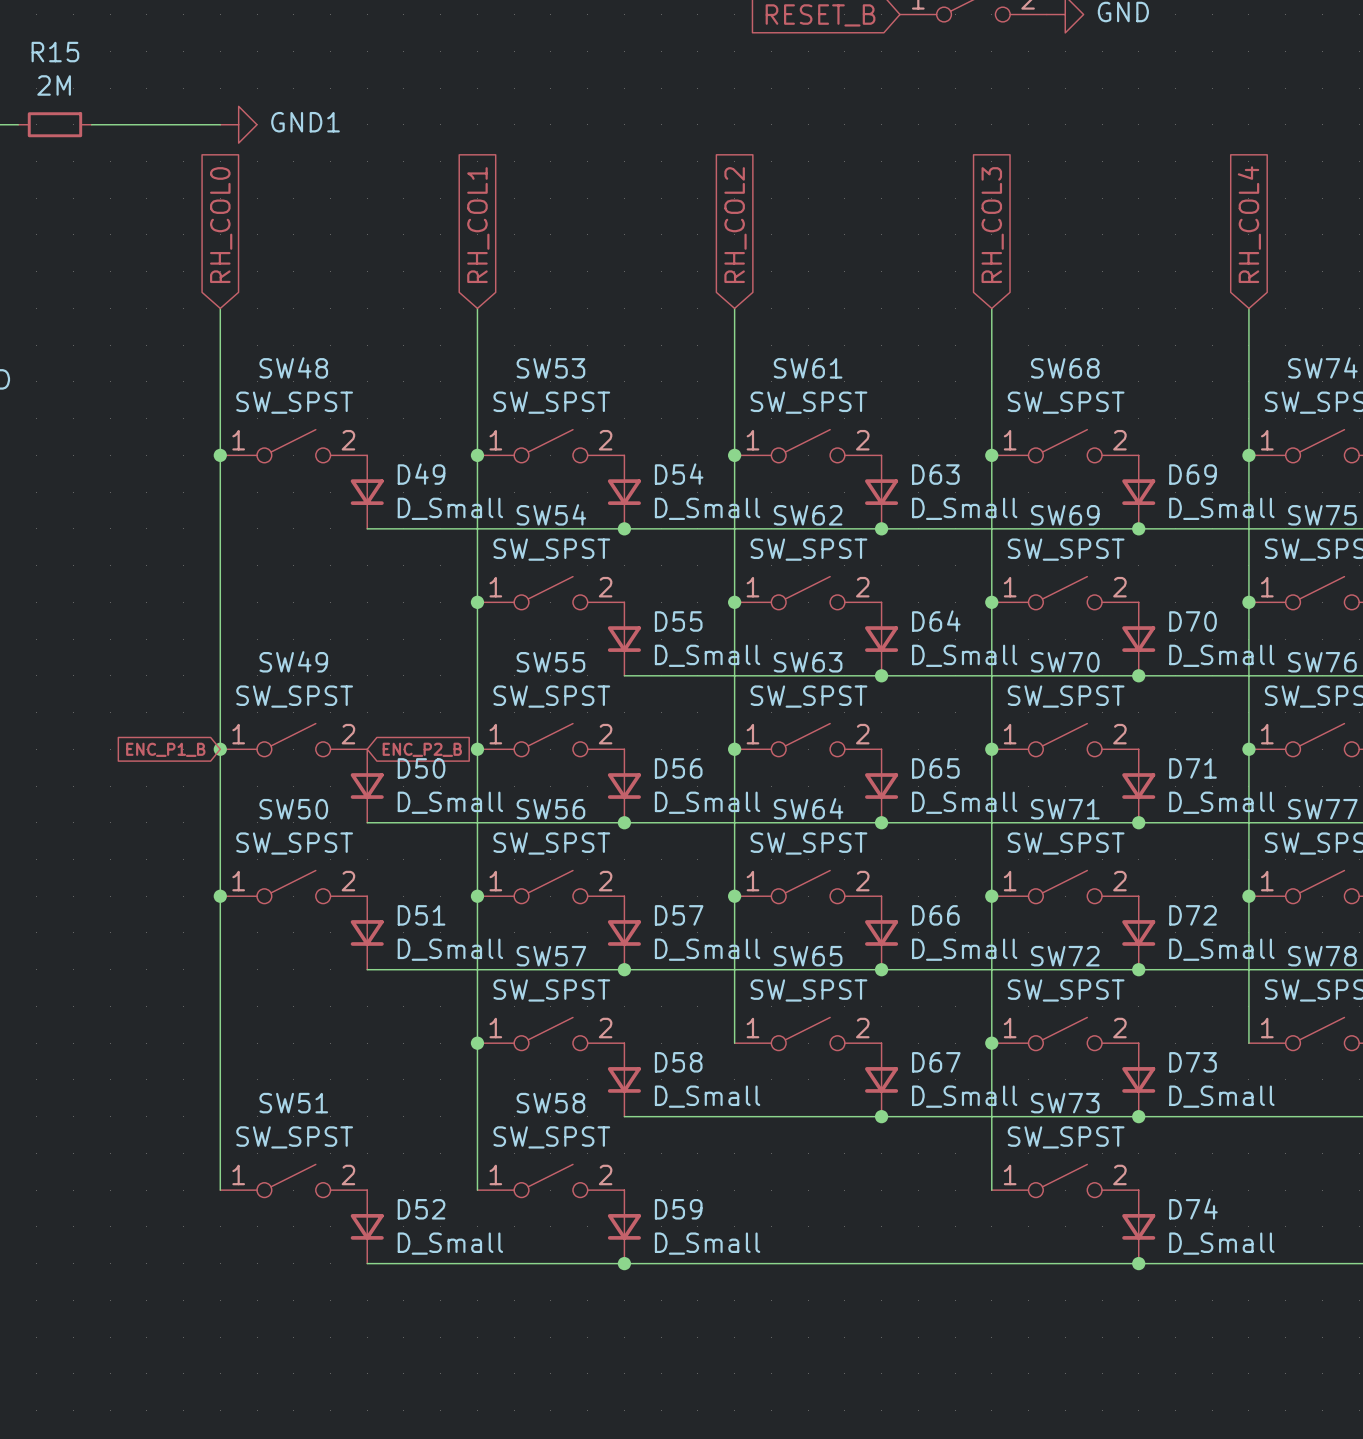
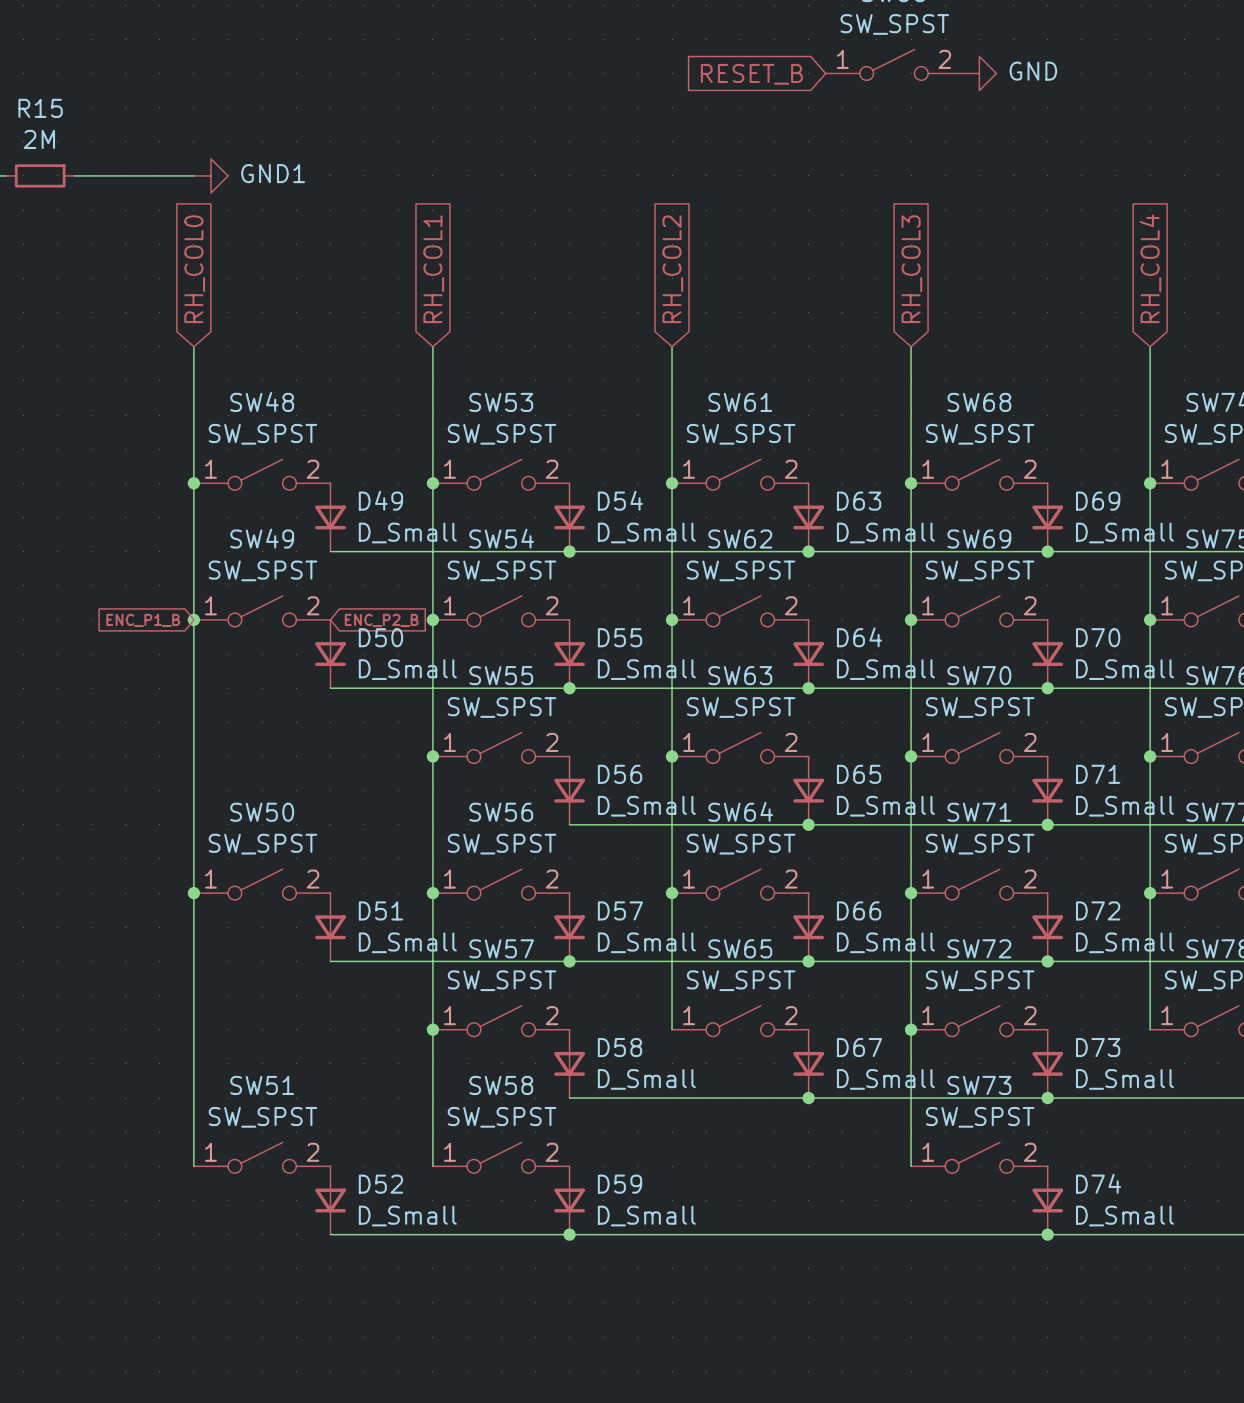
junction: none -> (193, 619)
junction: none -> (569, 688)
SW49 position: (293, 740) -> (262, 611)
global label position: ENC_P1_B (165, 749) -> ENC_P1_B (143, 620)
junction: (220, 749) -> none
global label position: ENC_P2_B (422, 749) -> ENC_P2_B (381, 620)
D50 position: (367, 786) -> (330, 654)
wire: (367, 822) (624, 822) -> (330, 688) (569, 688)
junction: (624, 822) -> none

